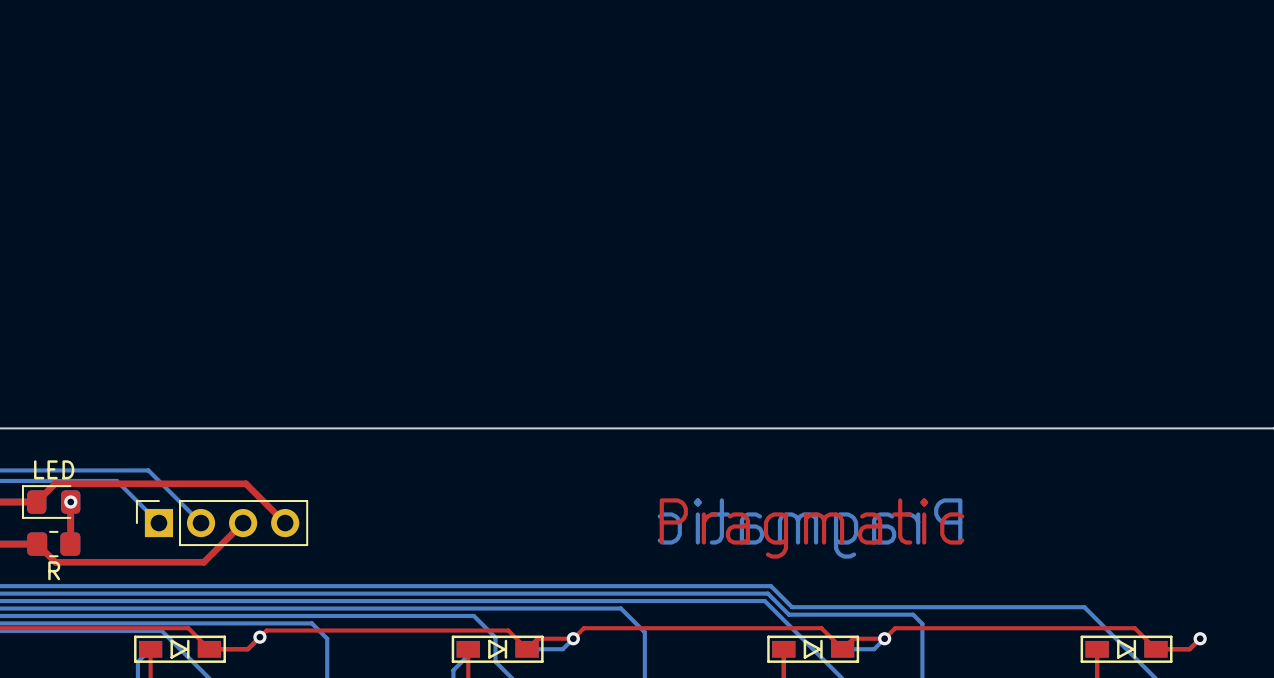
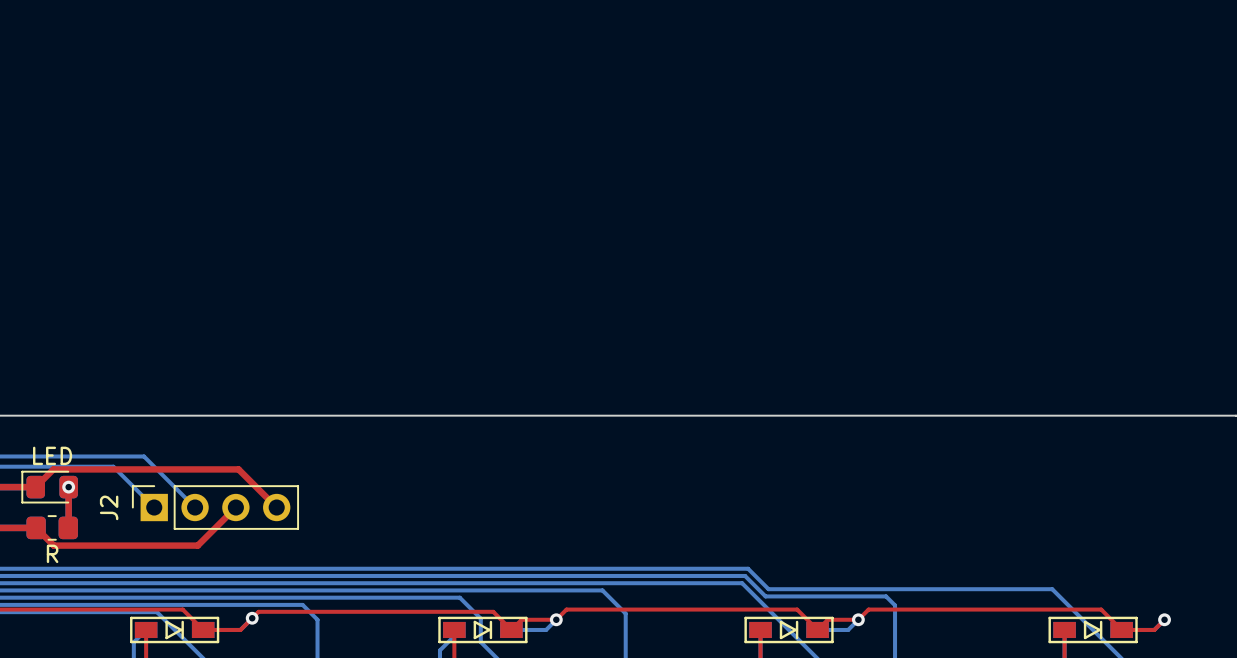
drawing: [657, 498, 965, 559] -> none
J2 name: none -> J2 (109, 507)

